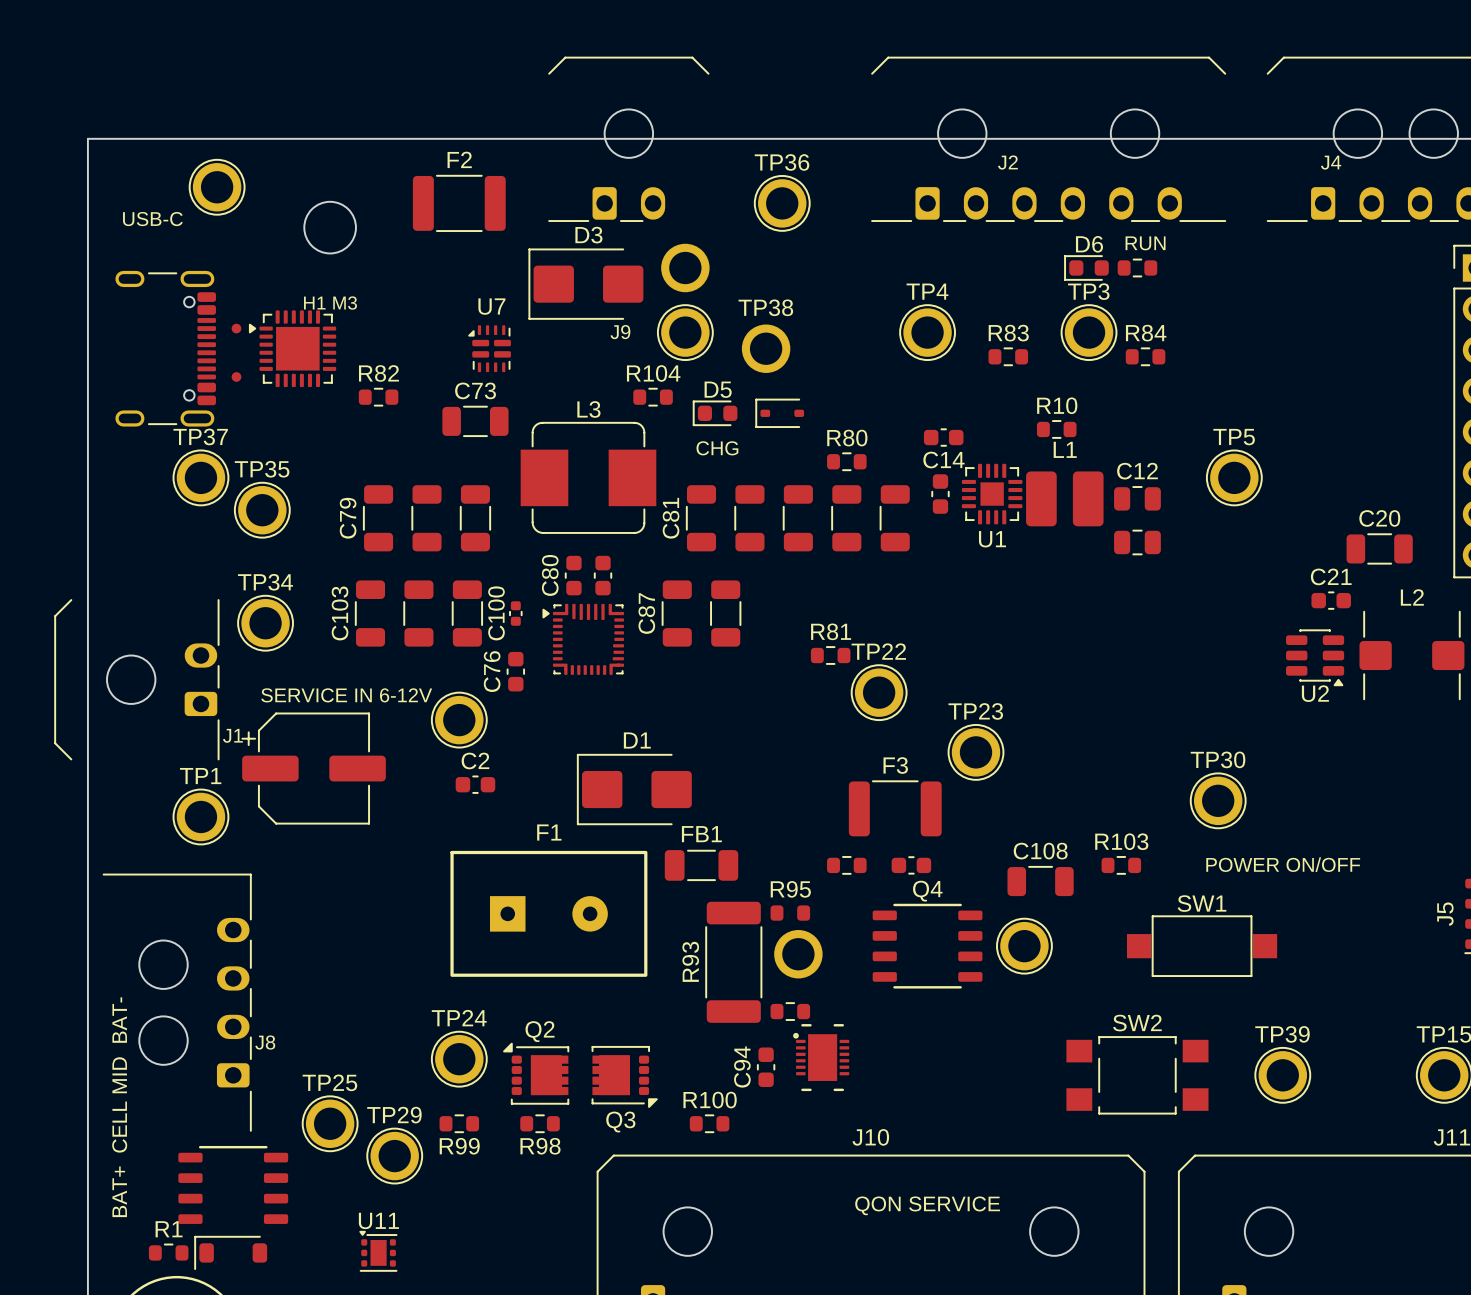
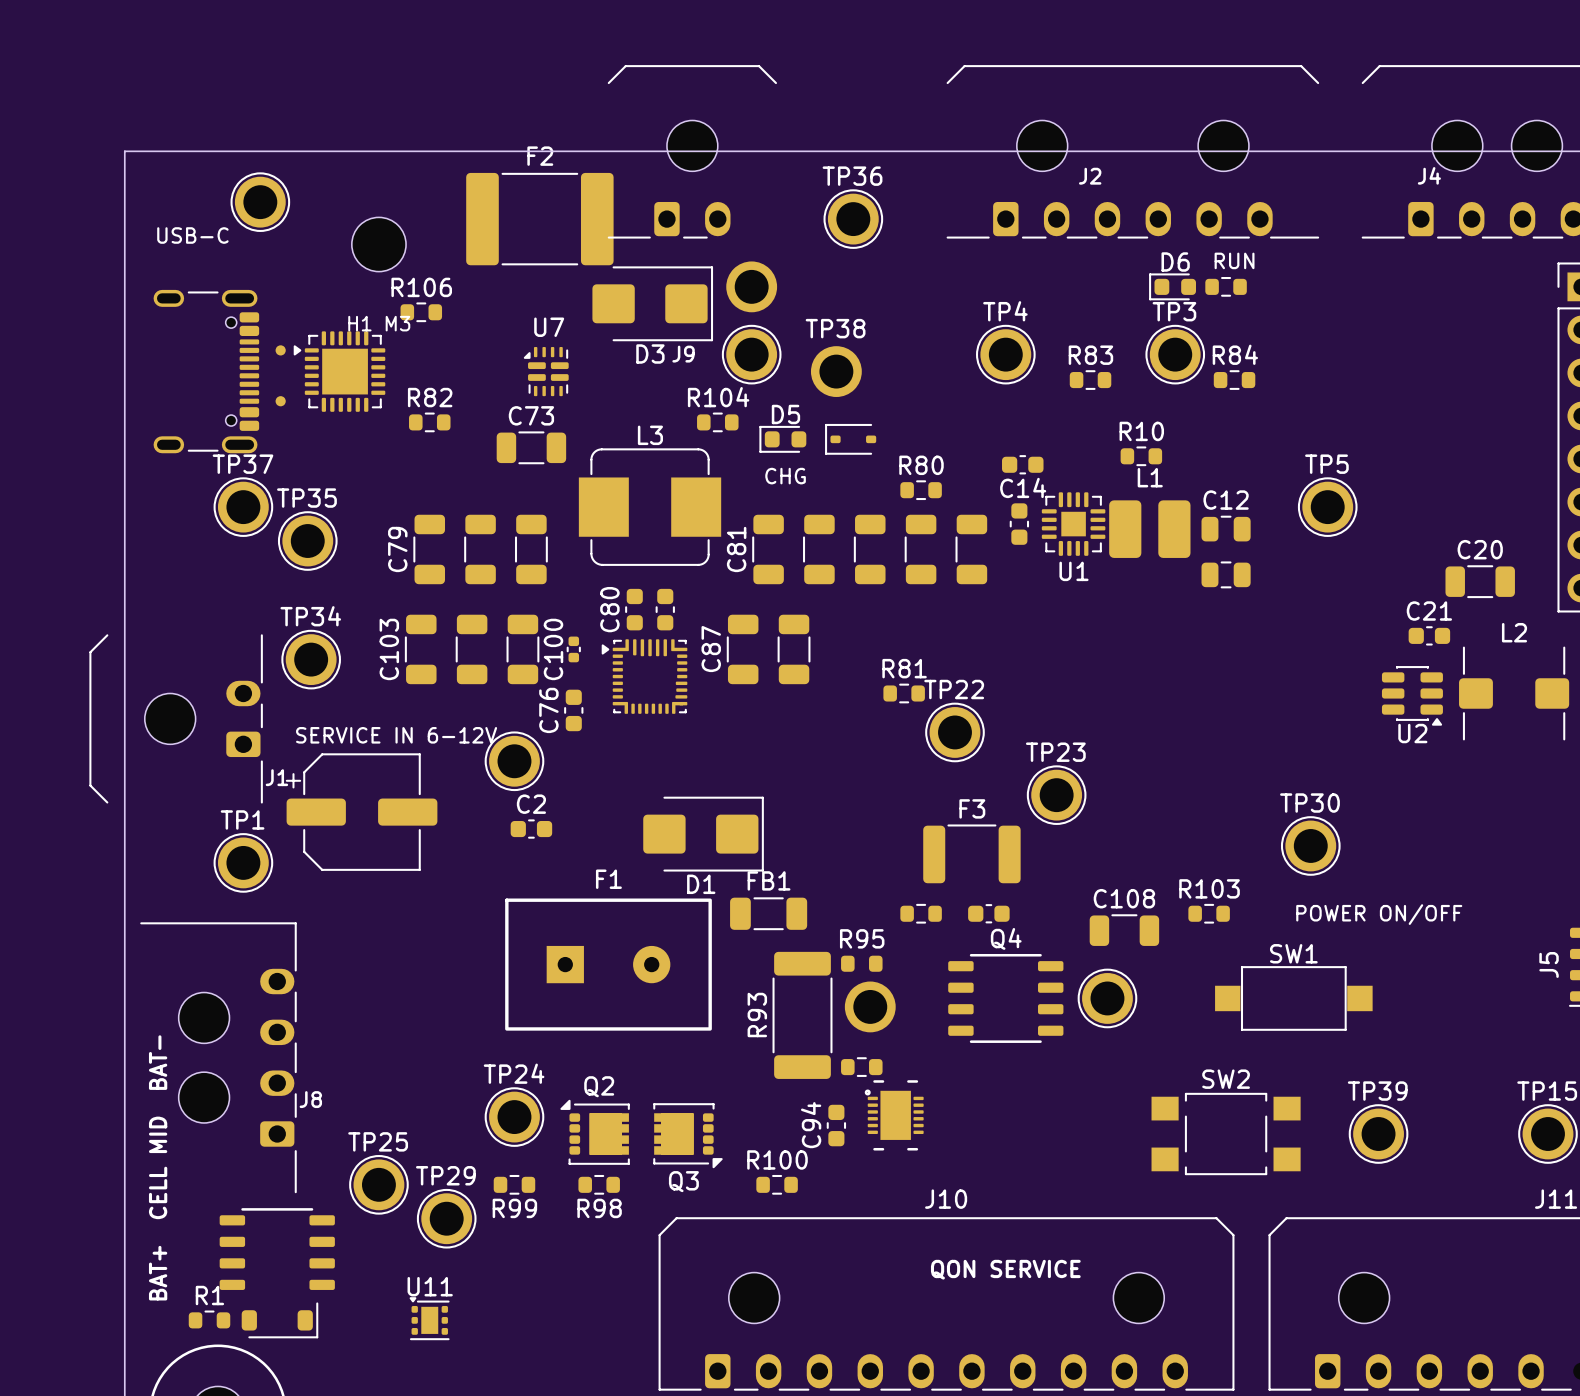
F2 footprint: [412, 174, 506, 232] -> [466, 172, 614, 266]
D3 rotation: 0° (585, 284) -> 180° (652, 303)
R106: none -> (421, 312)
D1 rotation: 0° (634, 789) -> 180° (703, 834)
part rotation: 0° (230, 1252) -> 180° (279, 1320)

